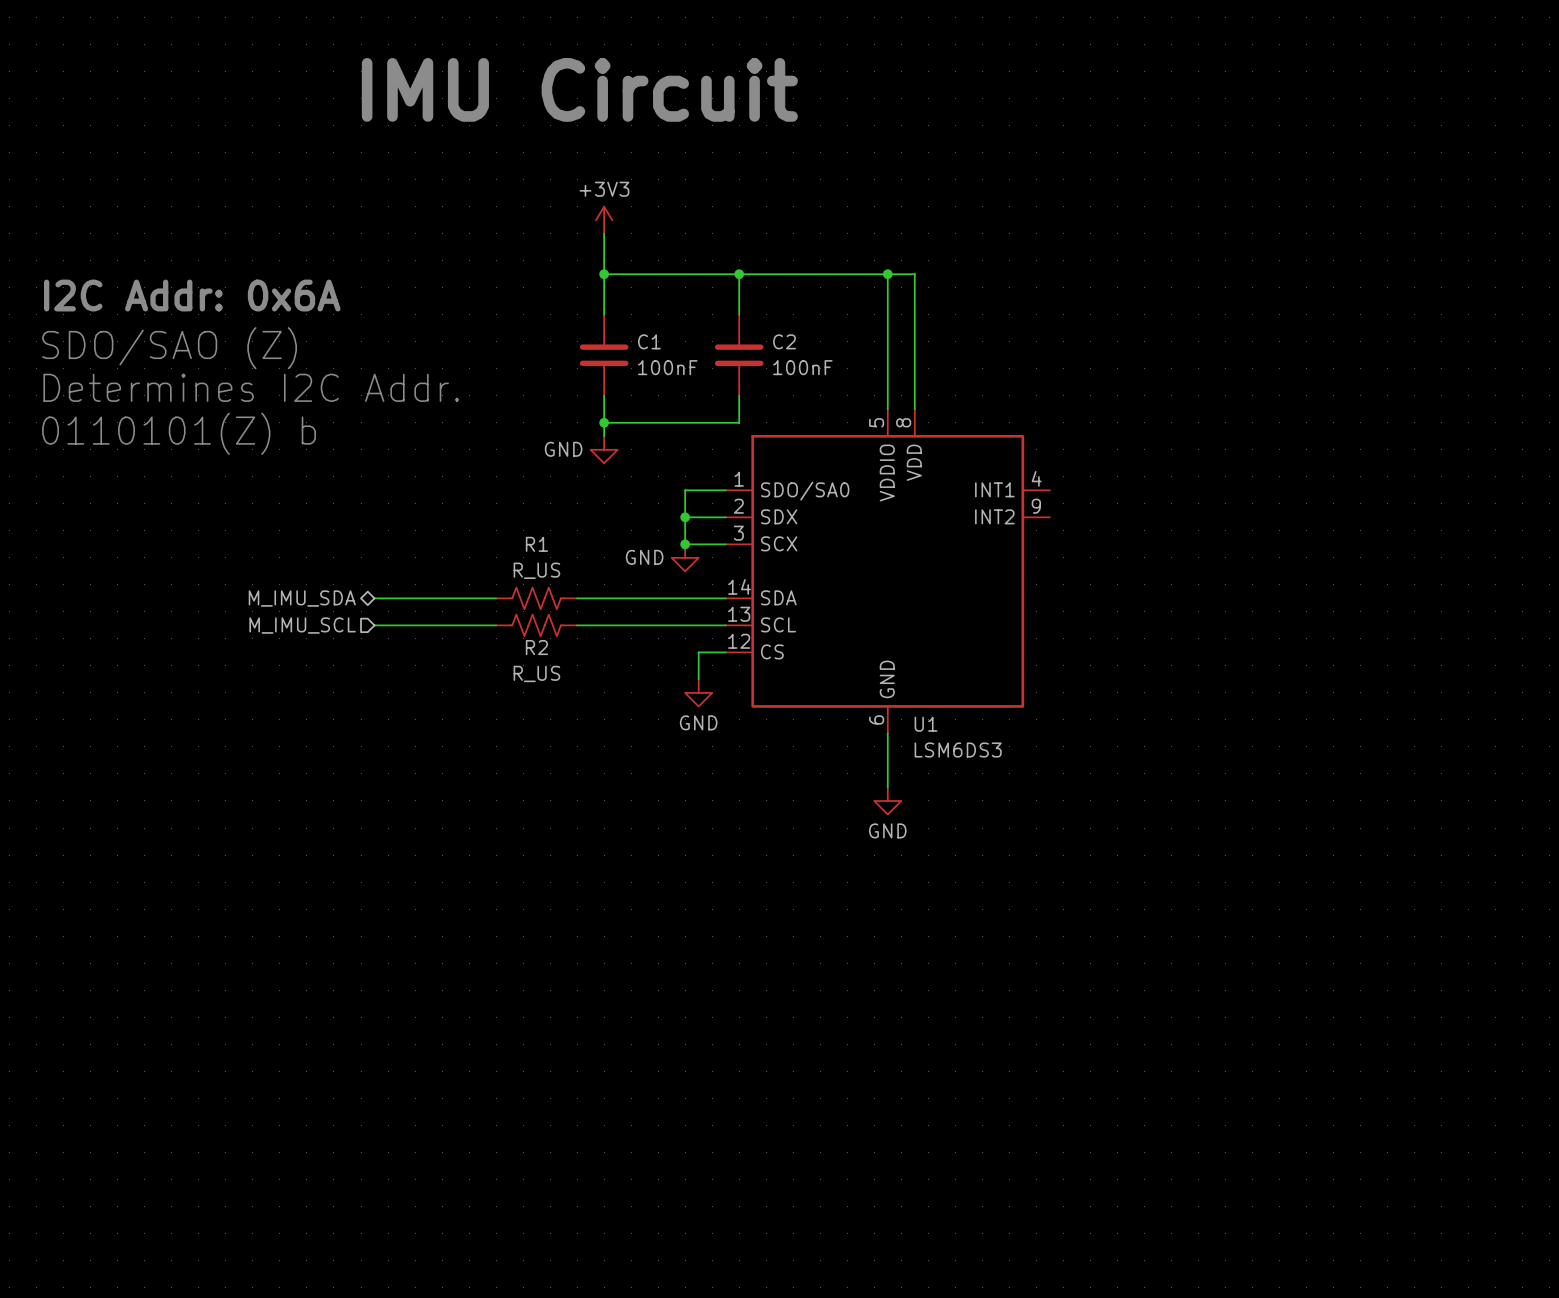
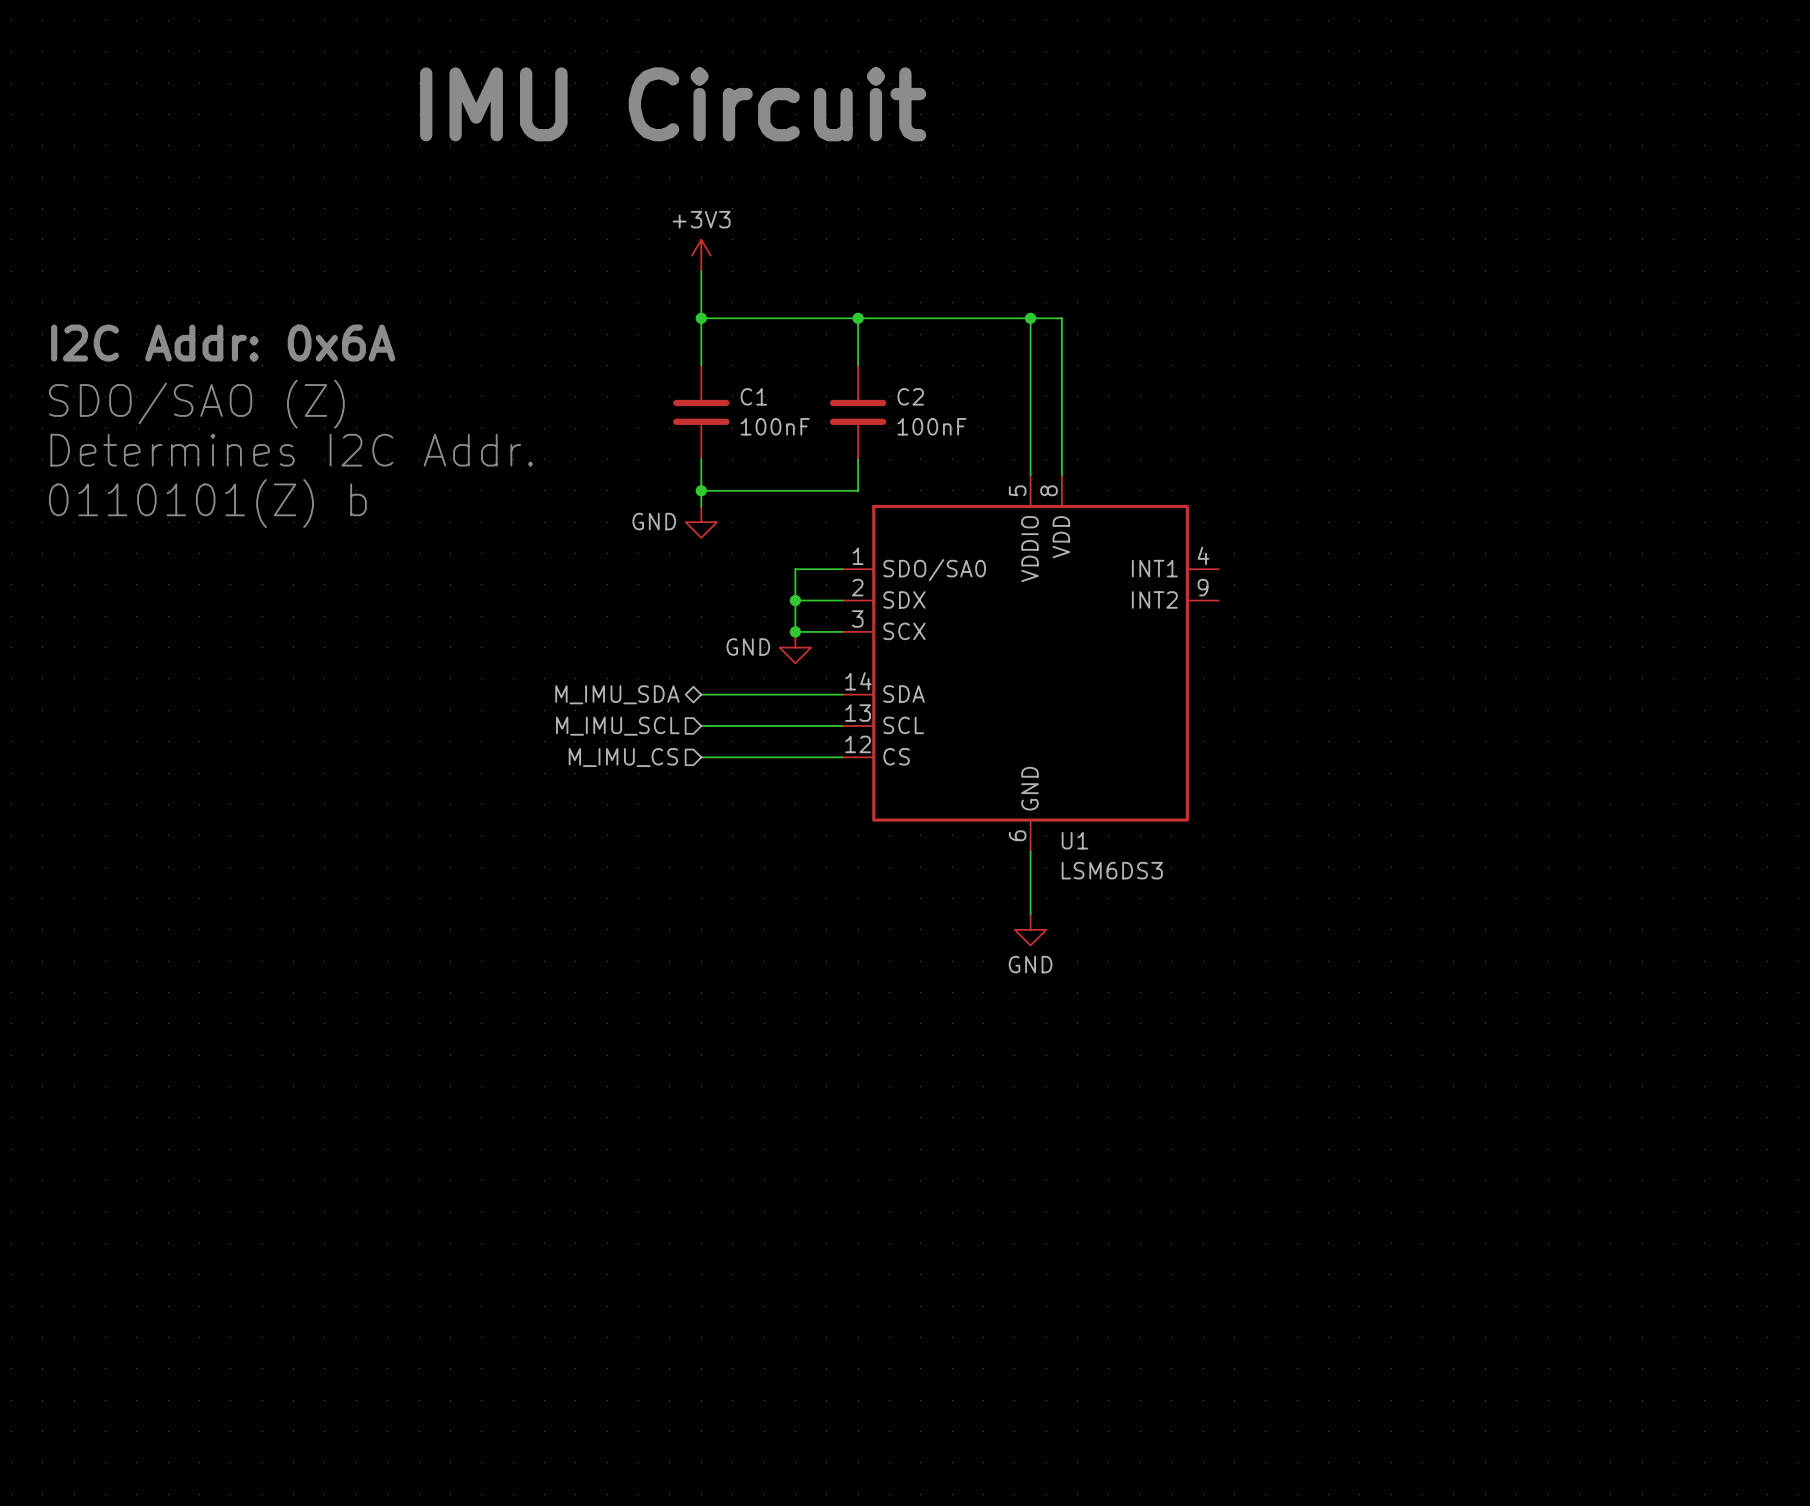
hierarchical label position: M_IMU_SDA (302, 598) -> M_IMU_SDA (617, 694)
wire: (374, 598) (496, 598) -> none
R1: R_US (536, 598) -> none
wire: (577, 598) (604, 598) -> none
hierarchical label position: M_IMU_SCL (302, 625) -> M_IMU_SCL (617, 726)
wire: (374, 625) (496, 625) -> none
R2: R_US (536, 625) -> none
wire: (577, 625) (604, 625) -> none
hierarchical label: none -> M_IMU_CS (623, 757)
wire: (698, 652) (698, 679) -> (811, 757) (701, 757)
power symbol: GND (698, 692) -> none

